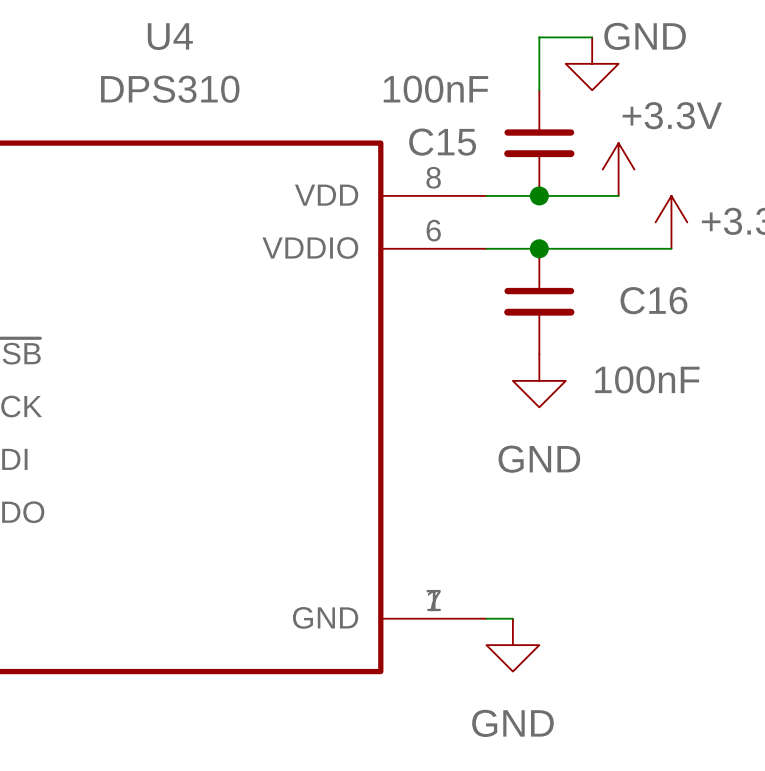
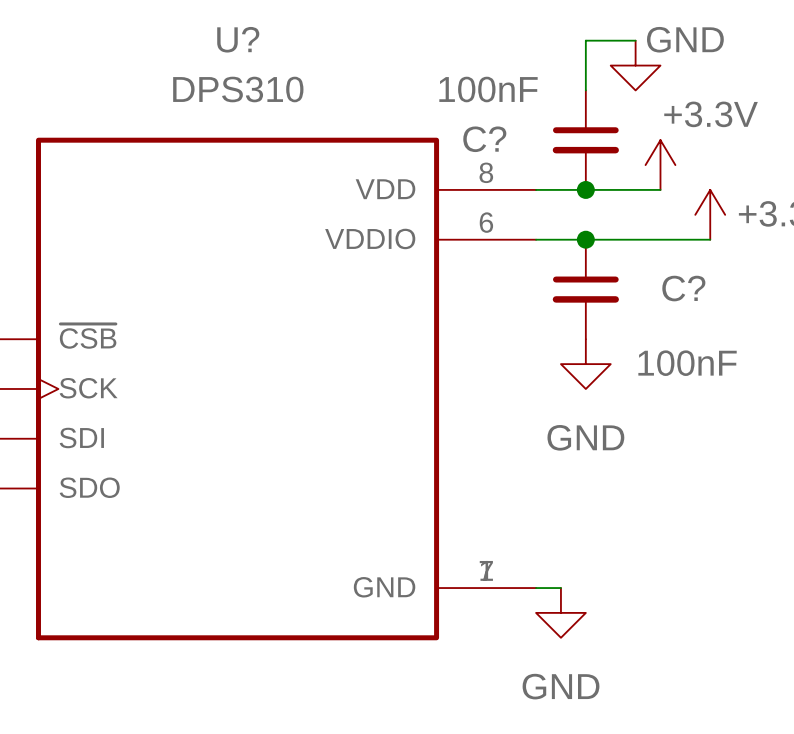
U4 name: U4 (170, 36) -> U? (238, 39)
C15 name: C15 (442, 142) -> C? (484, 139)
C16 name: C16 (653, 300) -> C? (683, 288)

